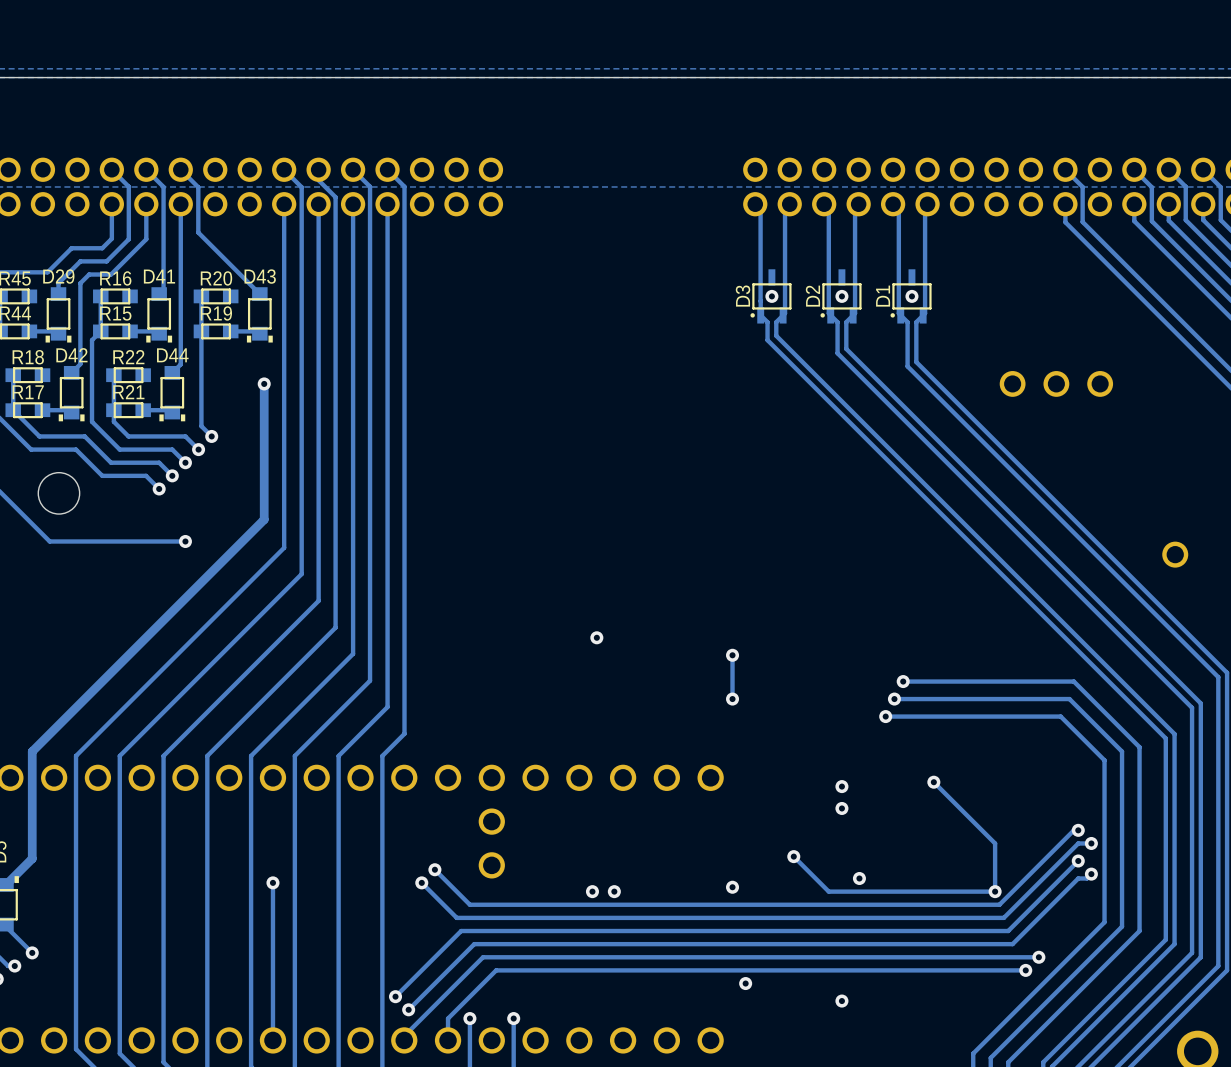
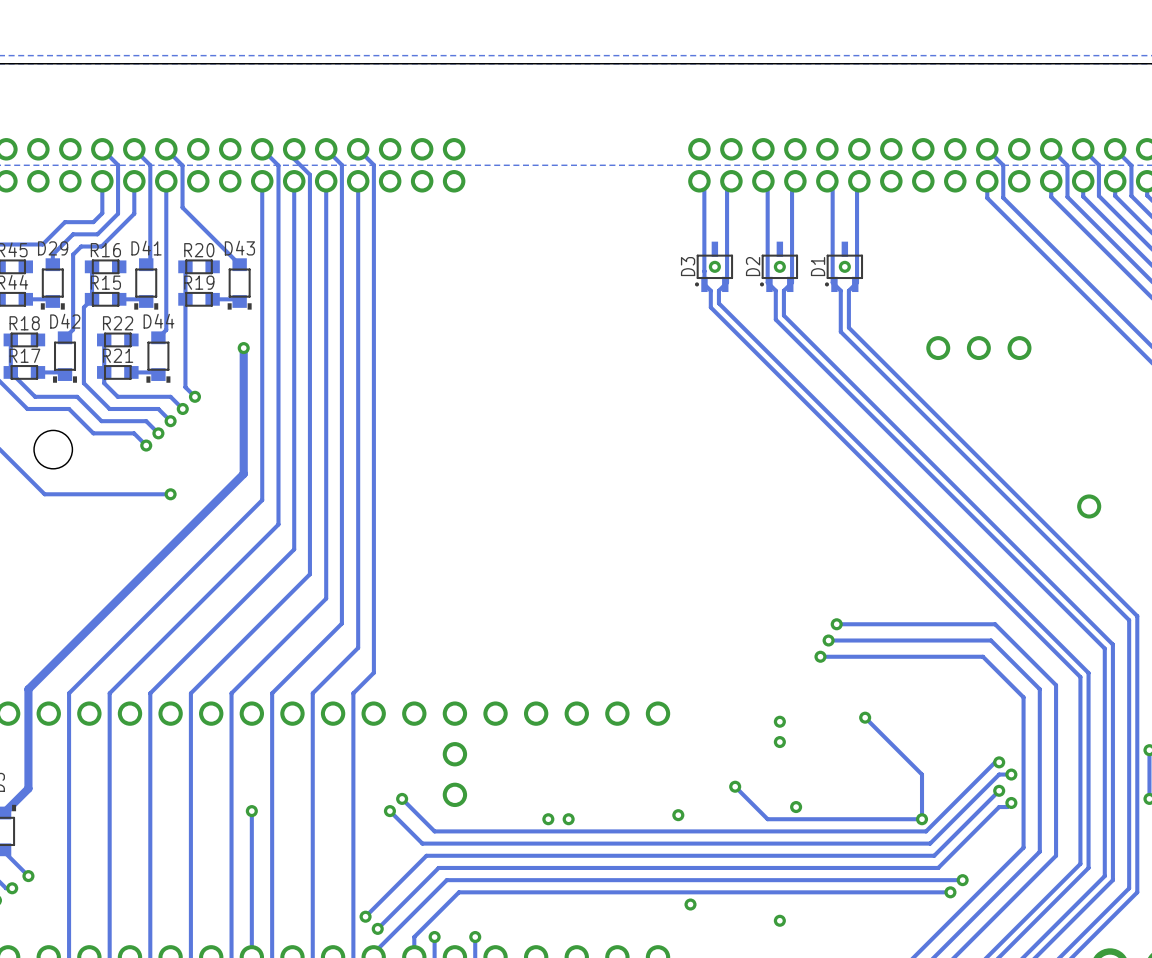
via: (596, 637) -> none
track: (732, 655) (732, 699) -> none
via: (732, 655) -> none
via: (732, 699) -> none

